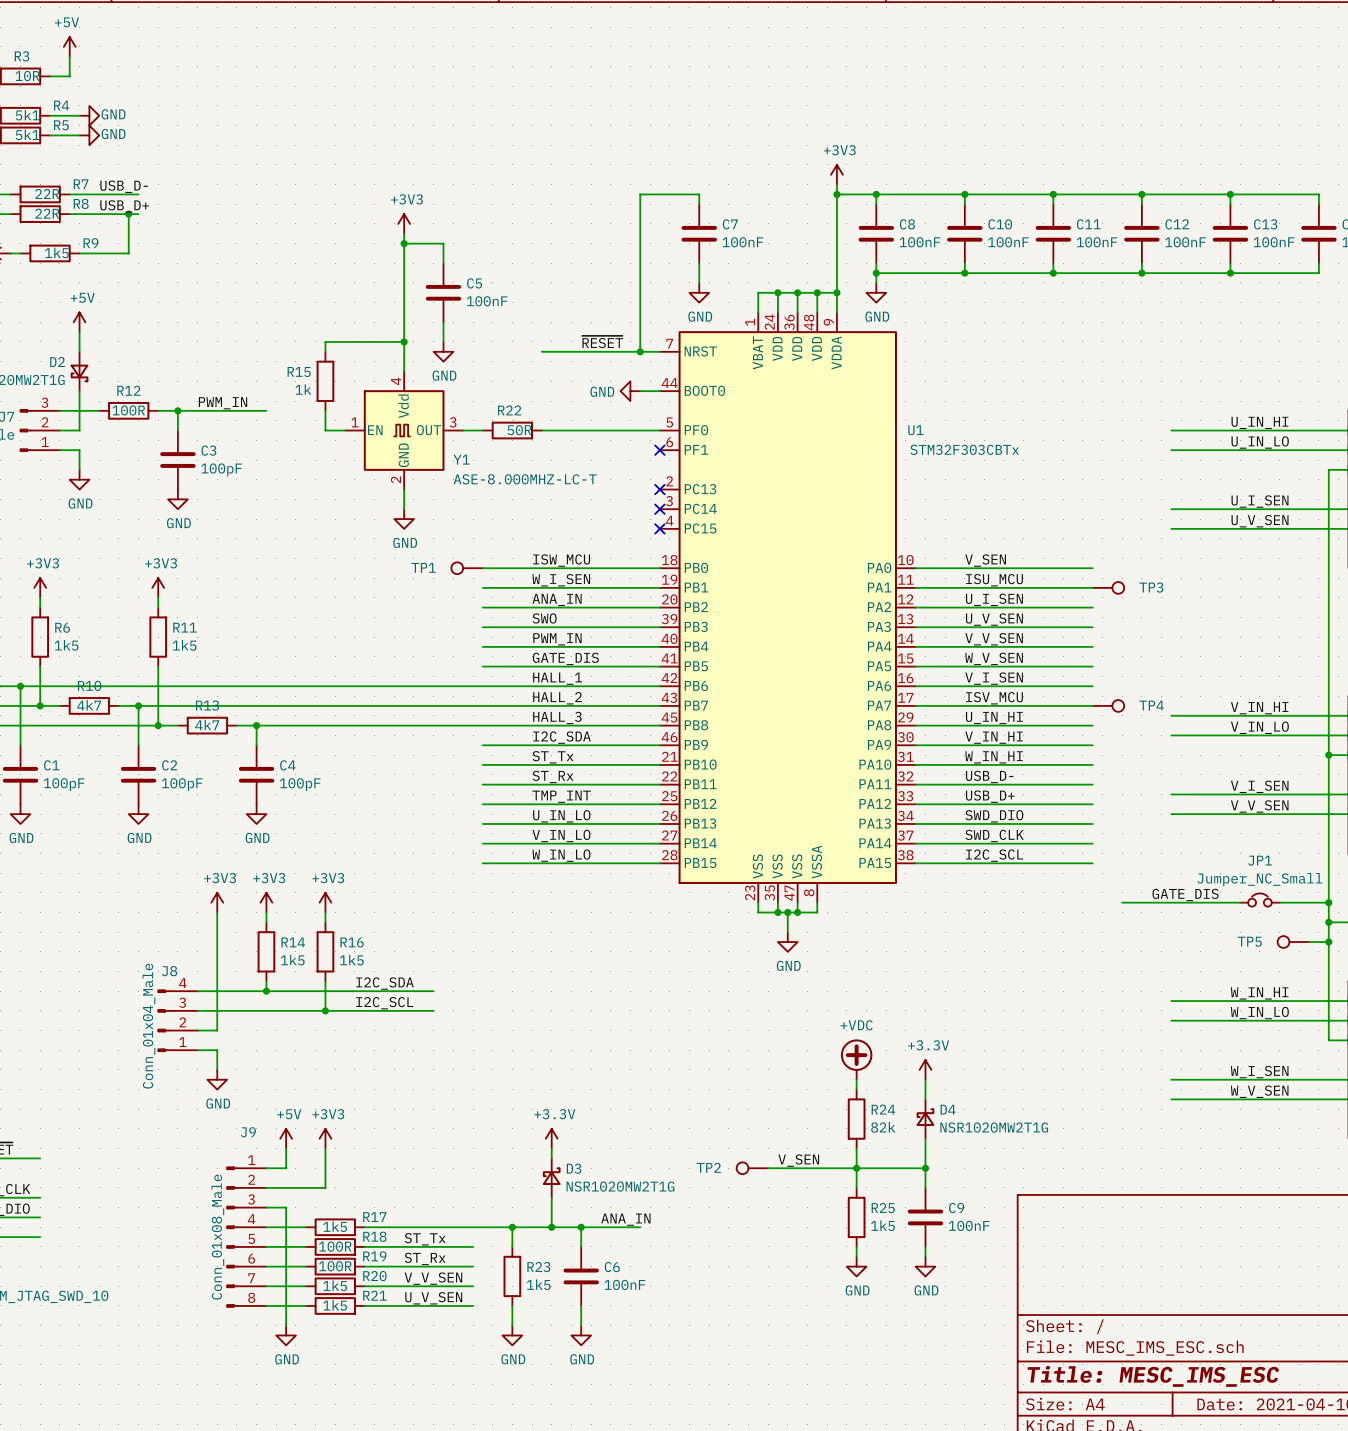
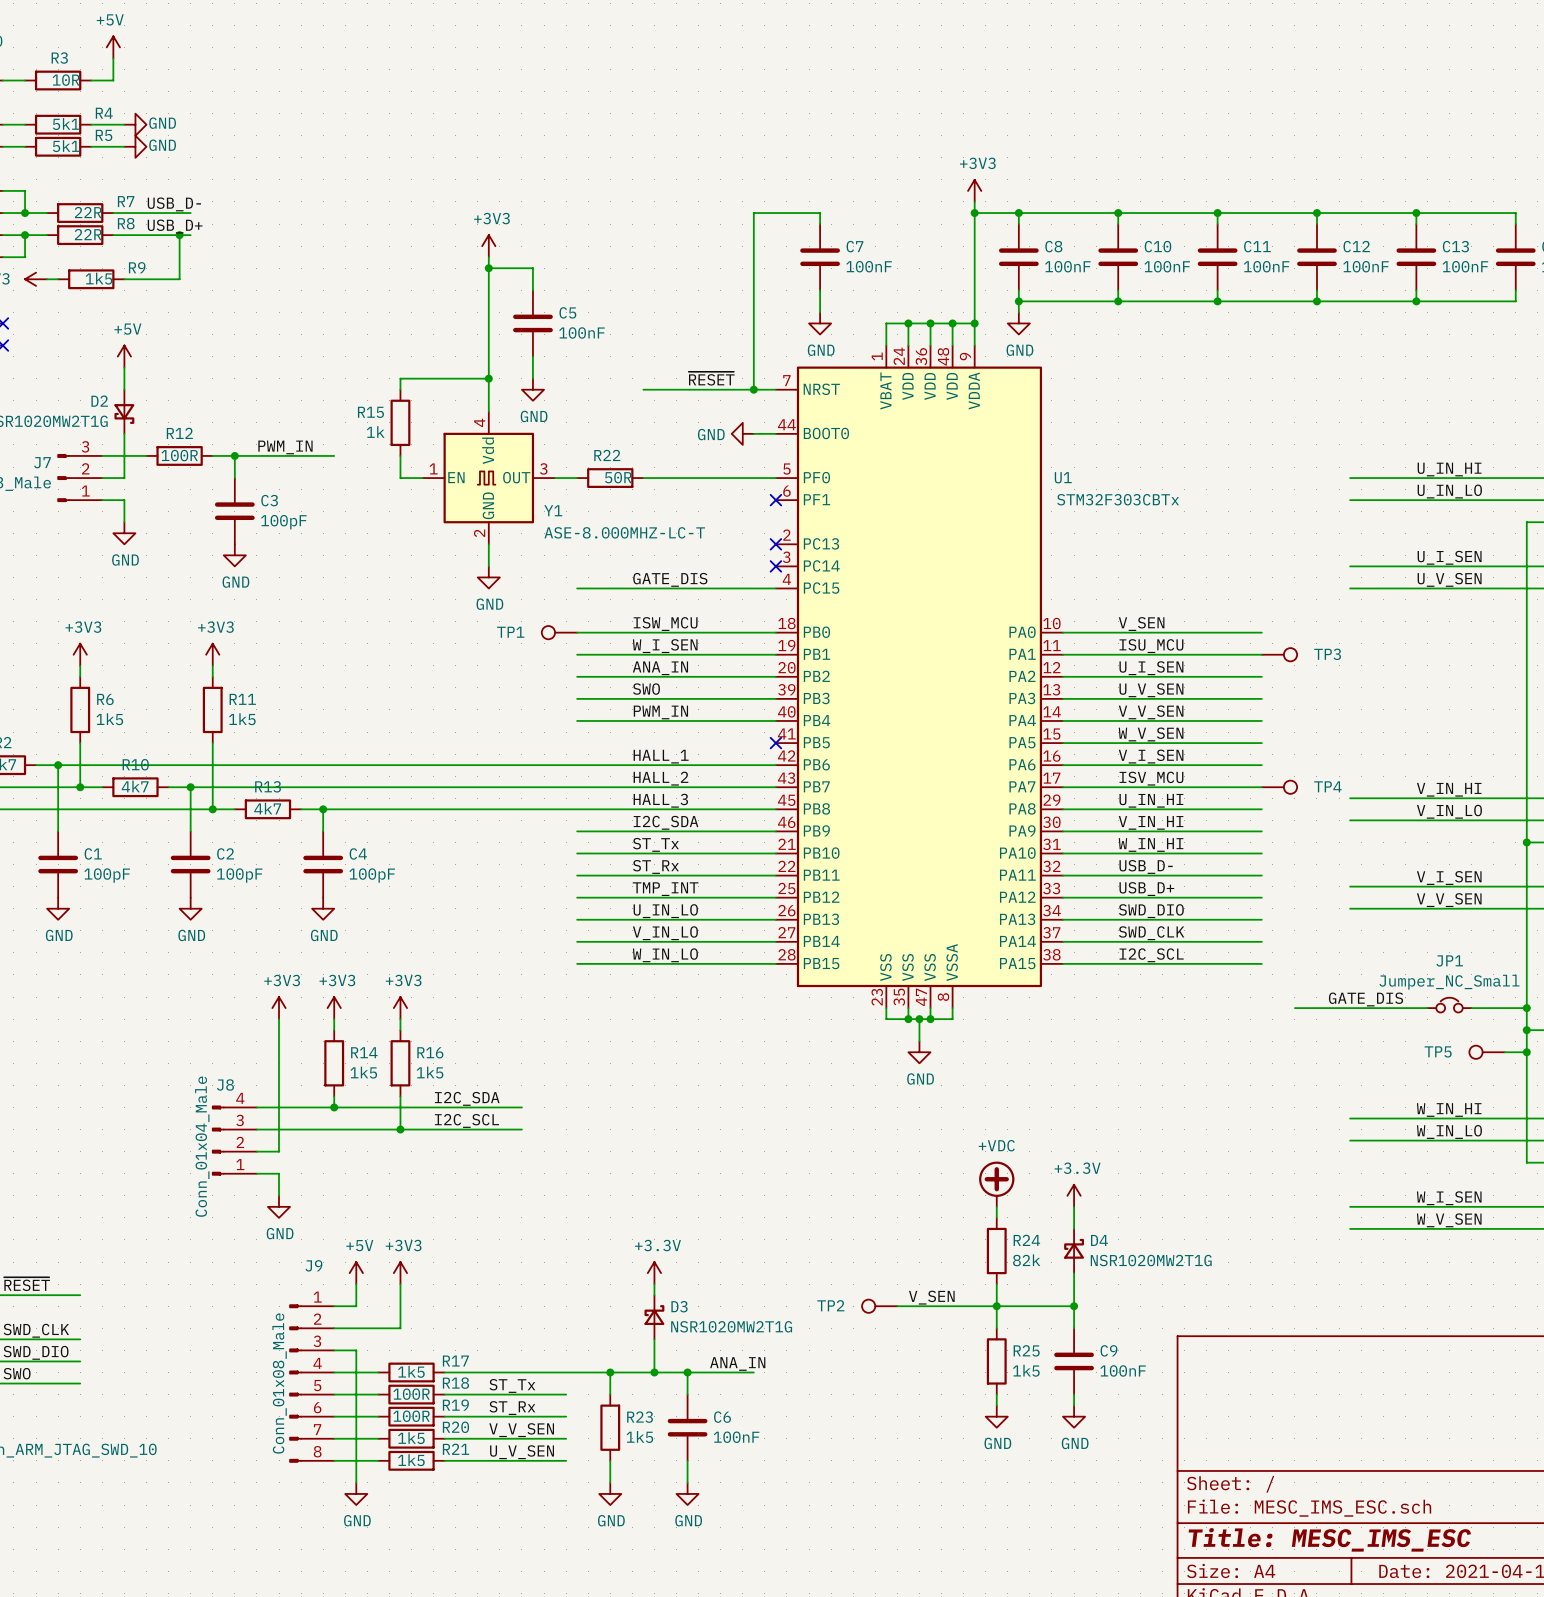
no-connect mark: (659, 528) -> none
label position: GATE_DIS (565, 658) -> GATE_DIS (670, 579)
wire: (482, 666) (659, 666) -> (577, 588) (775, 588)
no-connect mark: none -> (775, 743)

